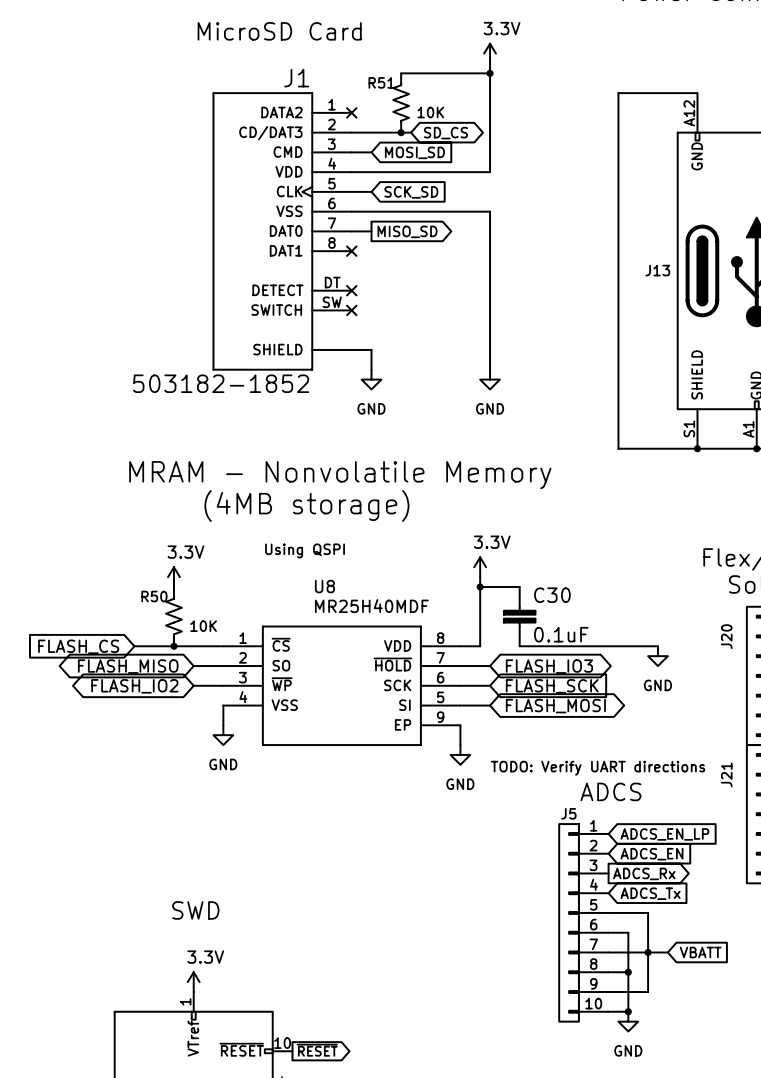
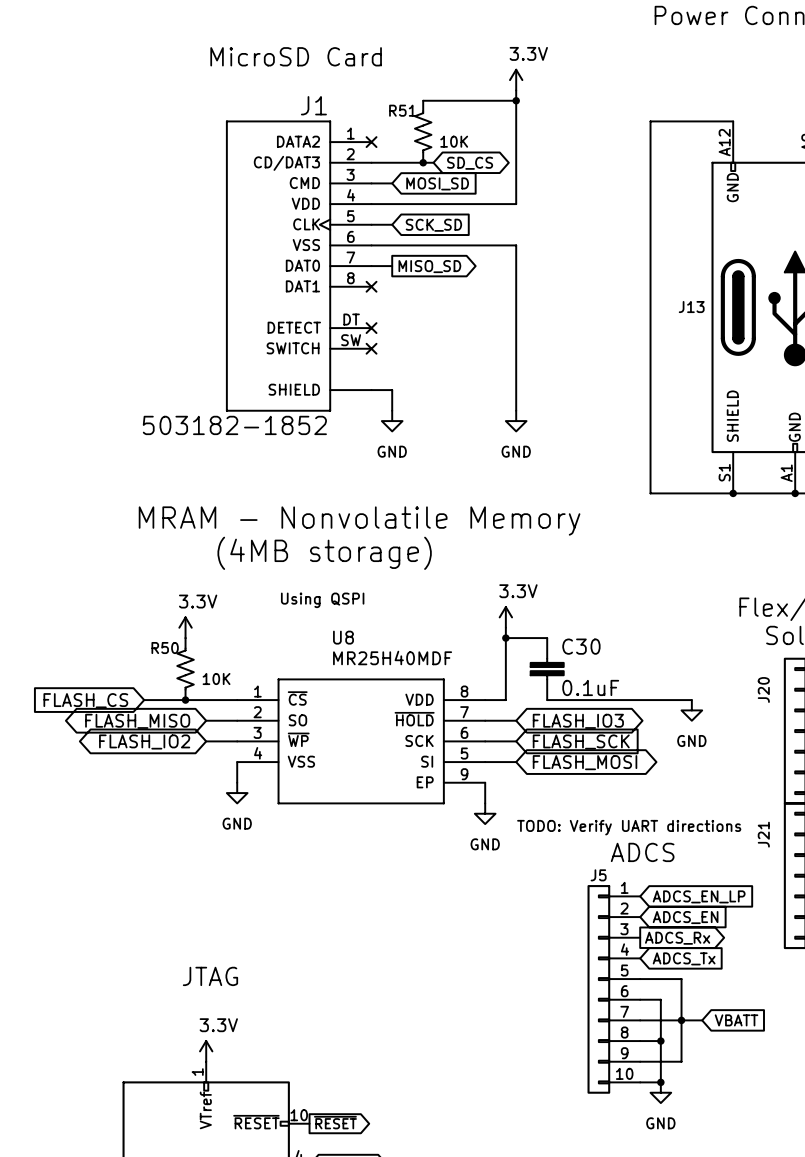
text: SWD (195, 910) -> JTAG (210, 976)

